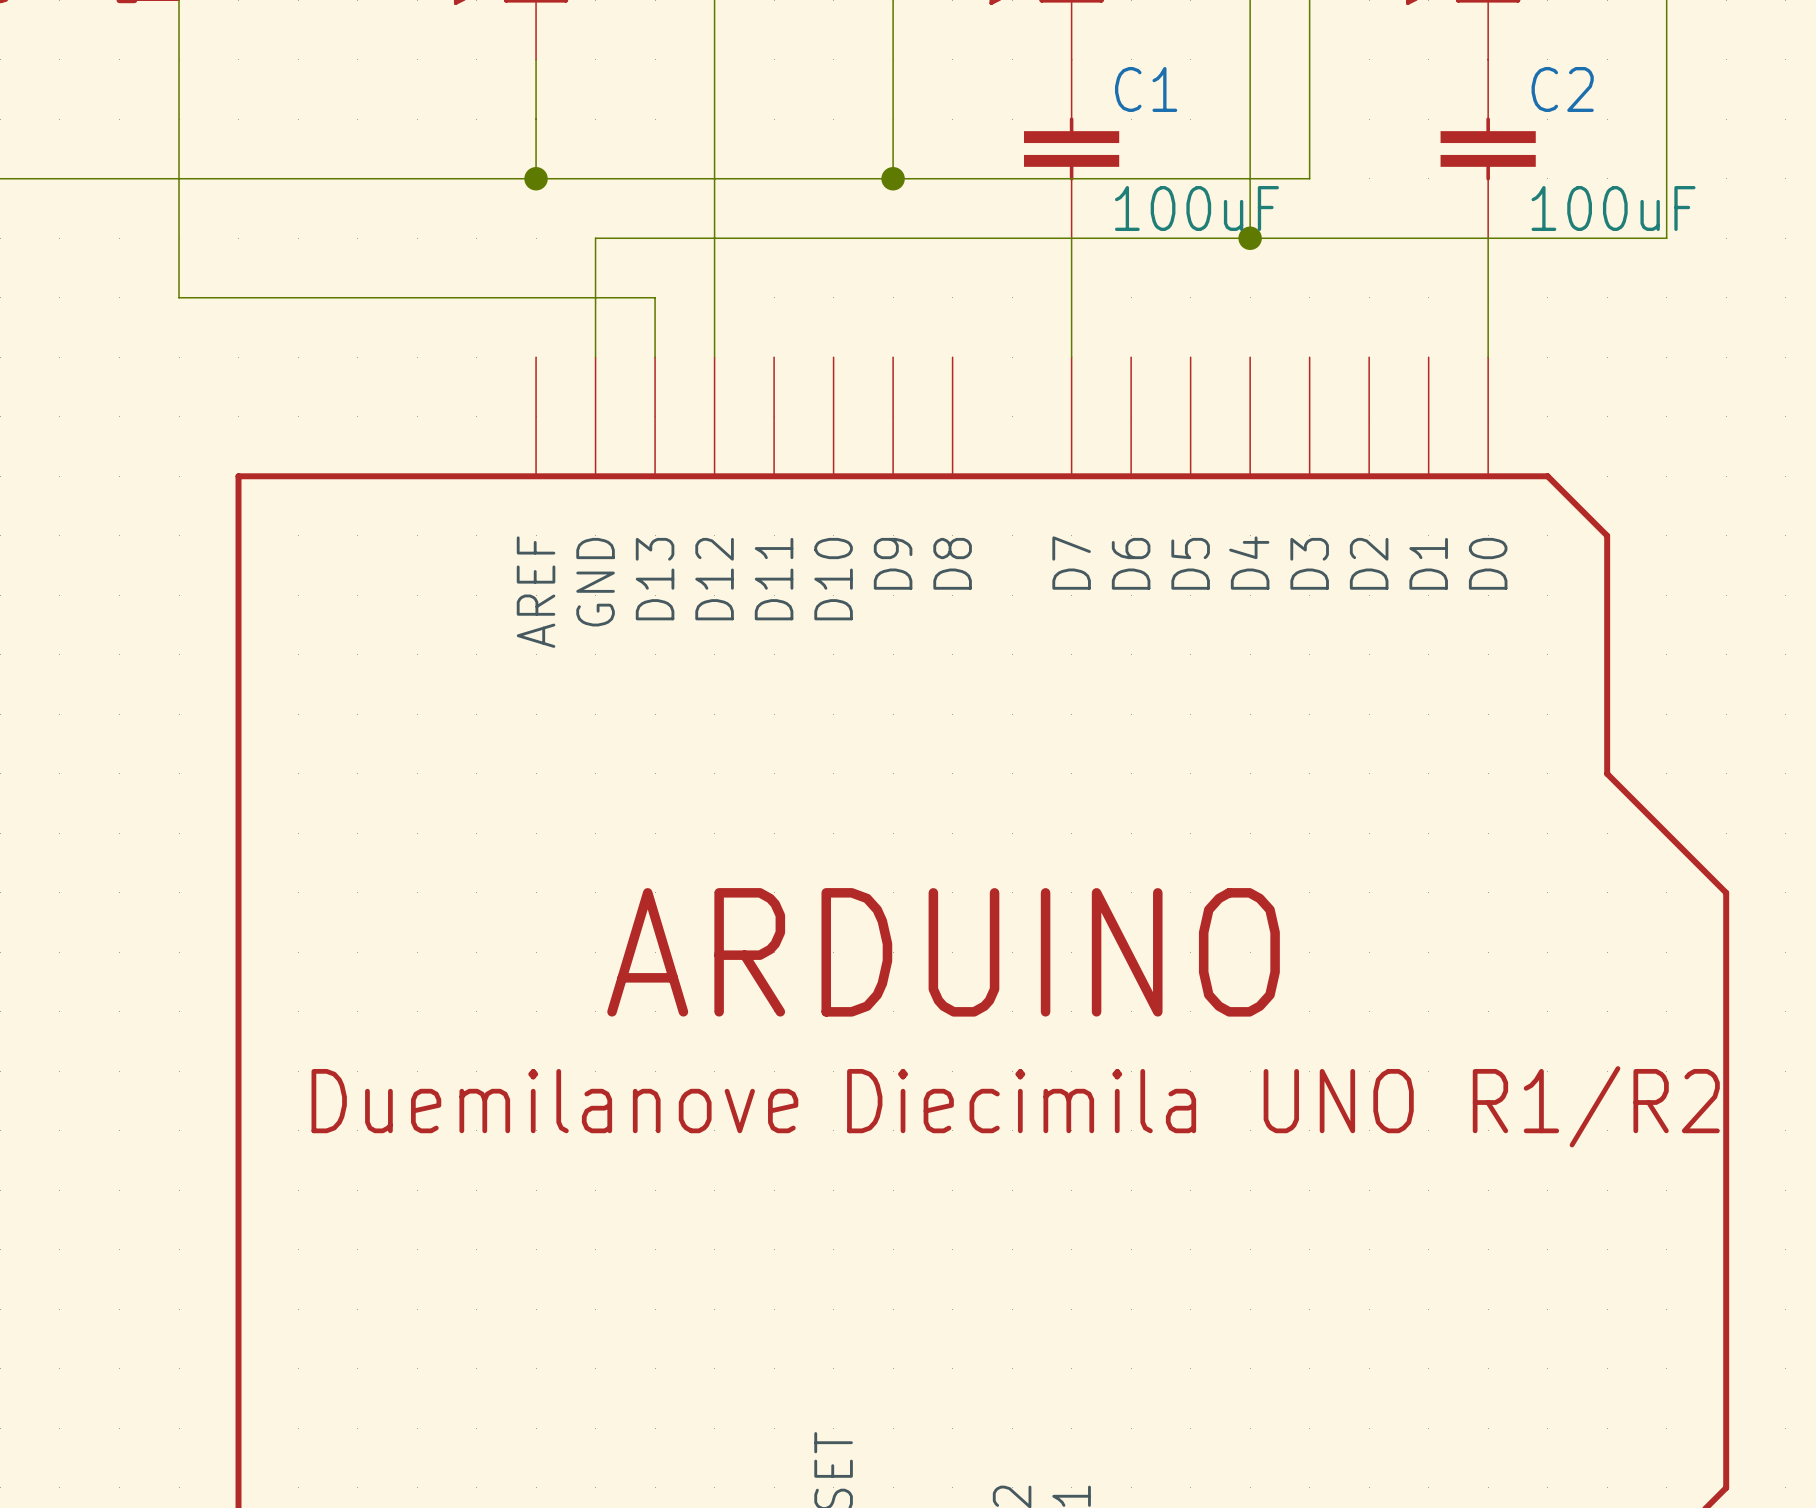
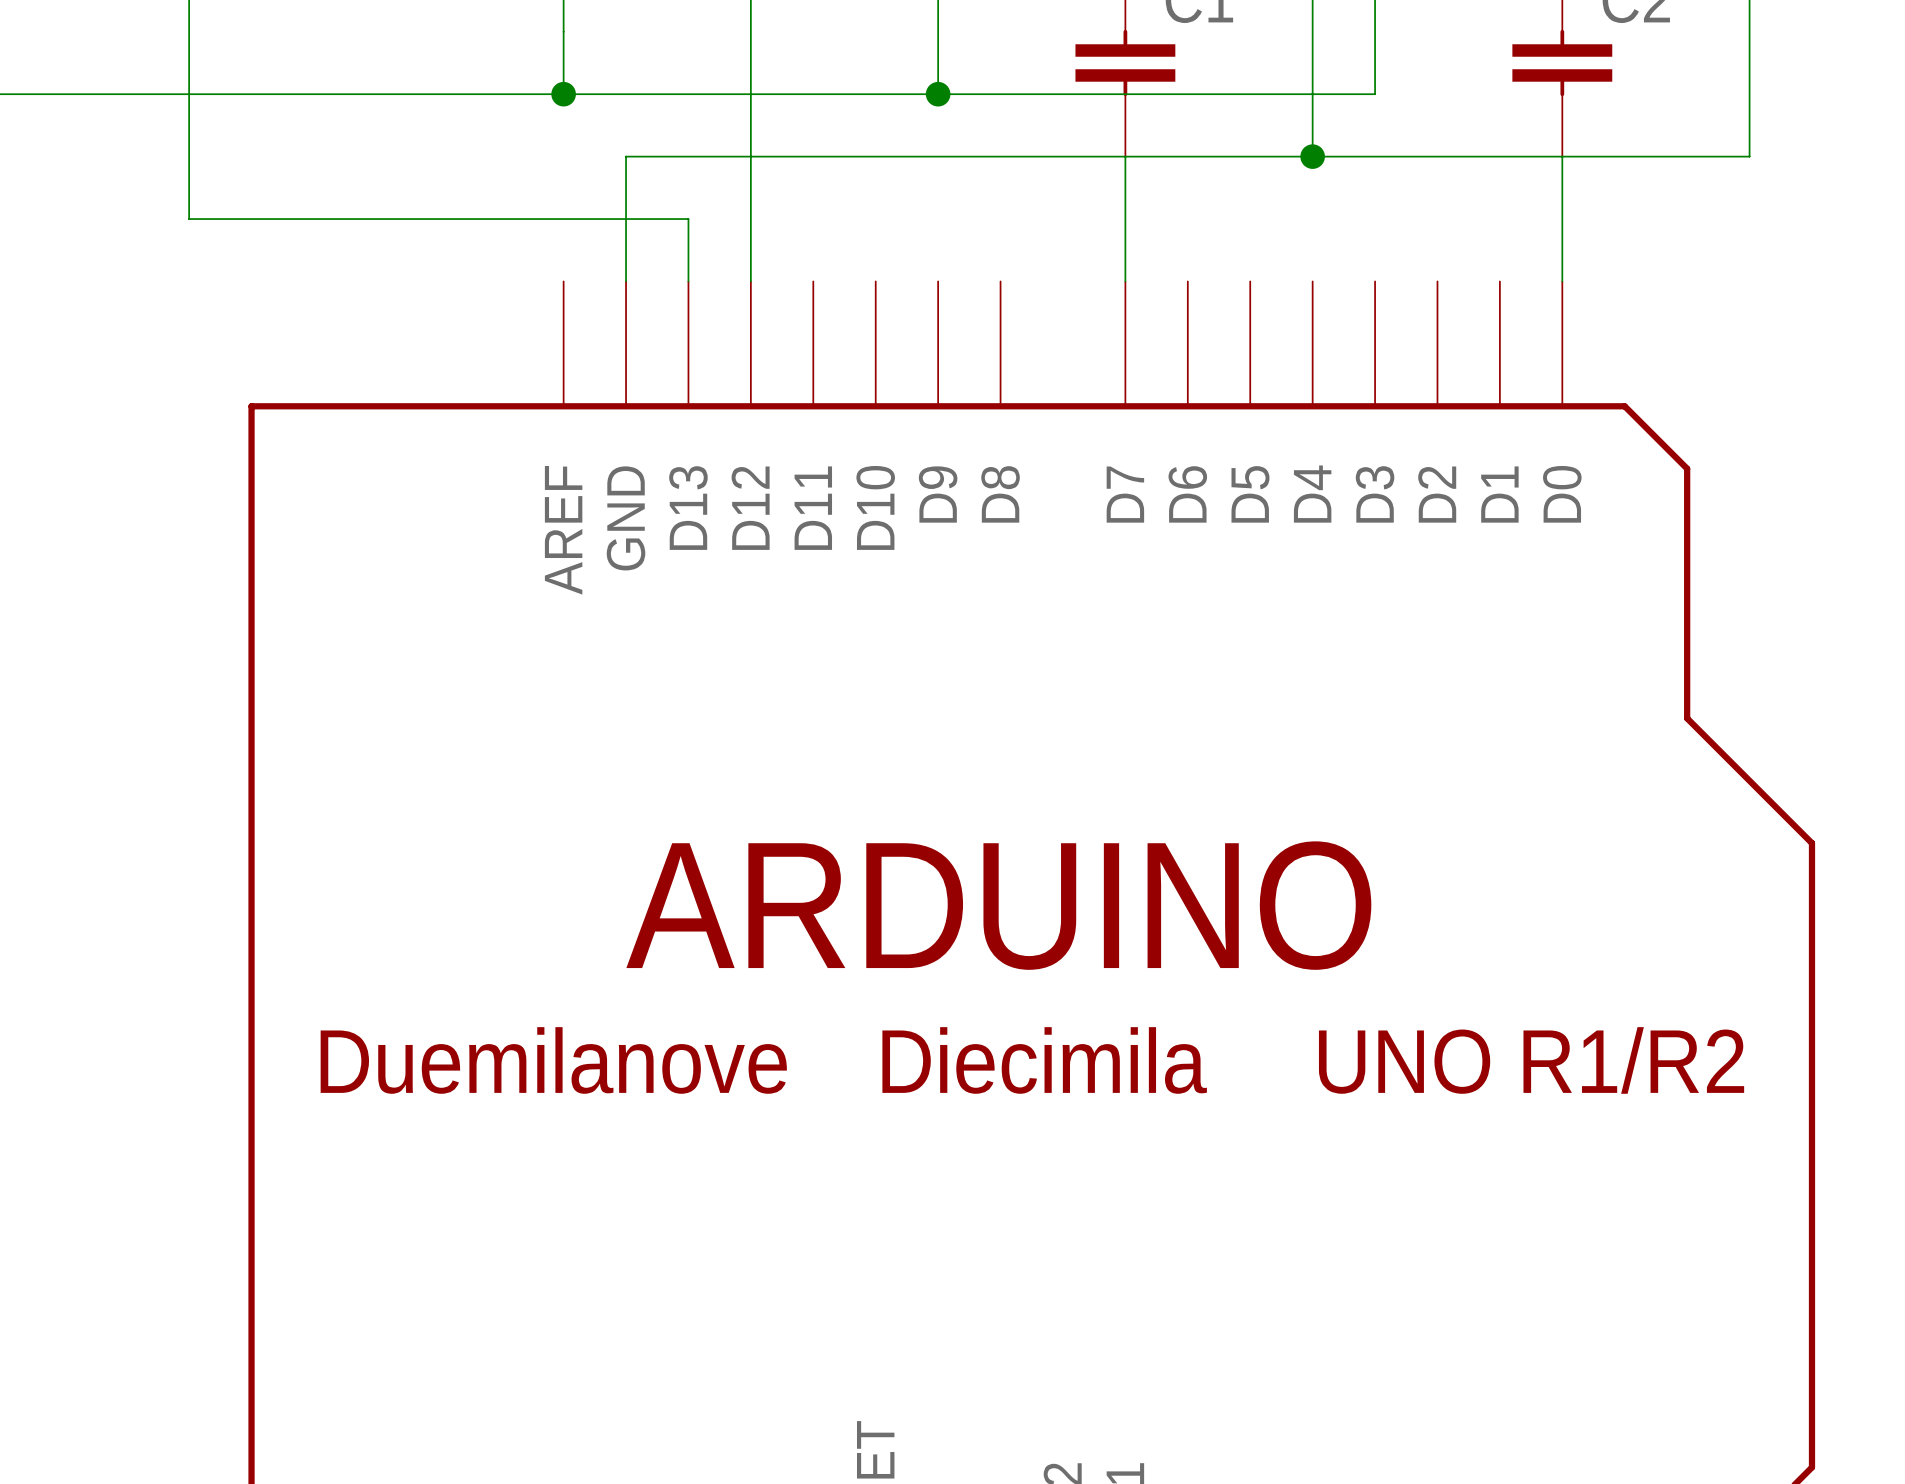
C1 value: 100uF (1196, 208) -> none
C2 value: 100uF (1613, 208) -> none

